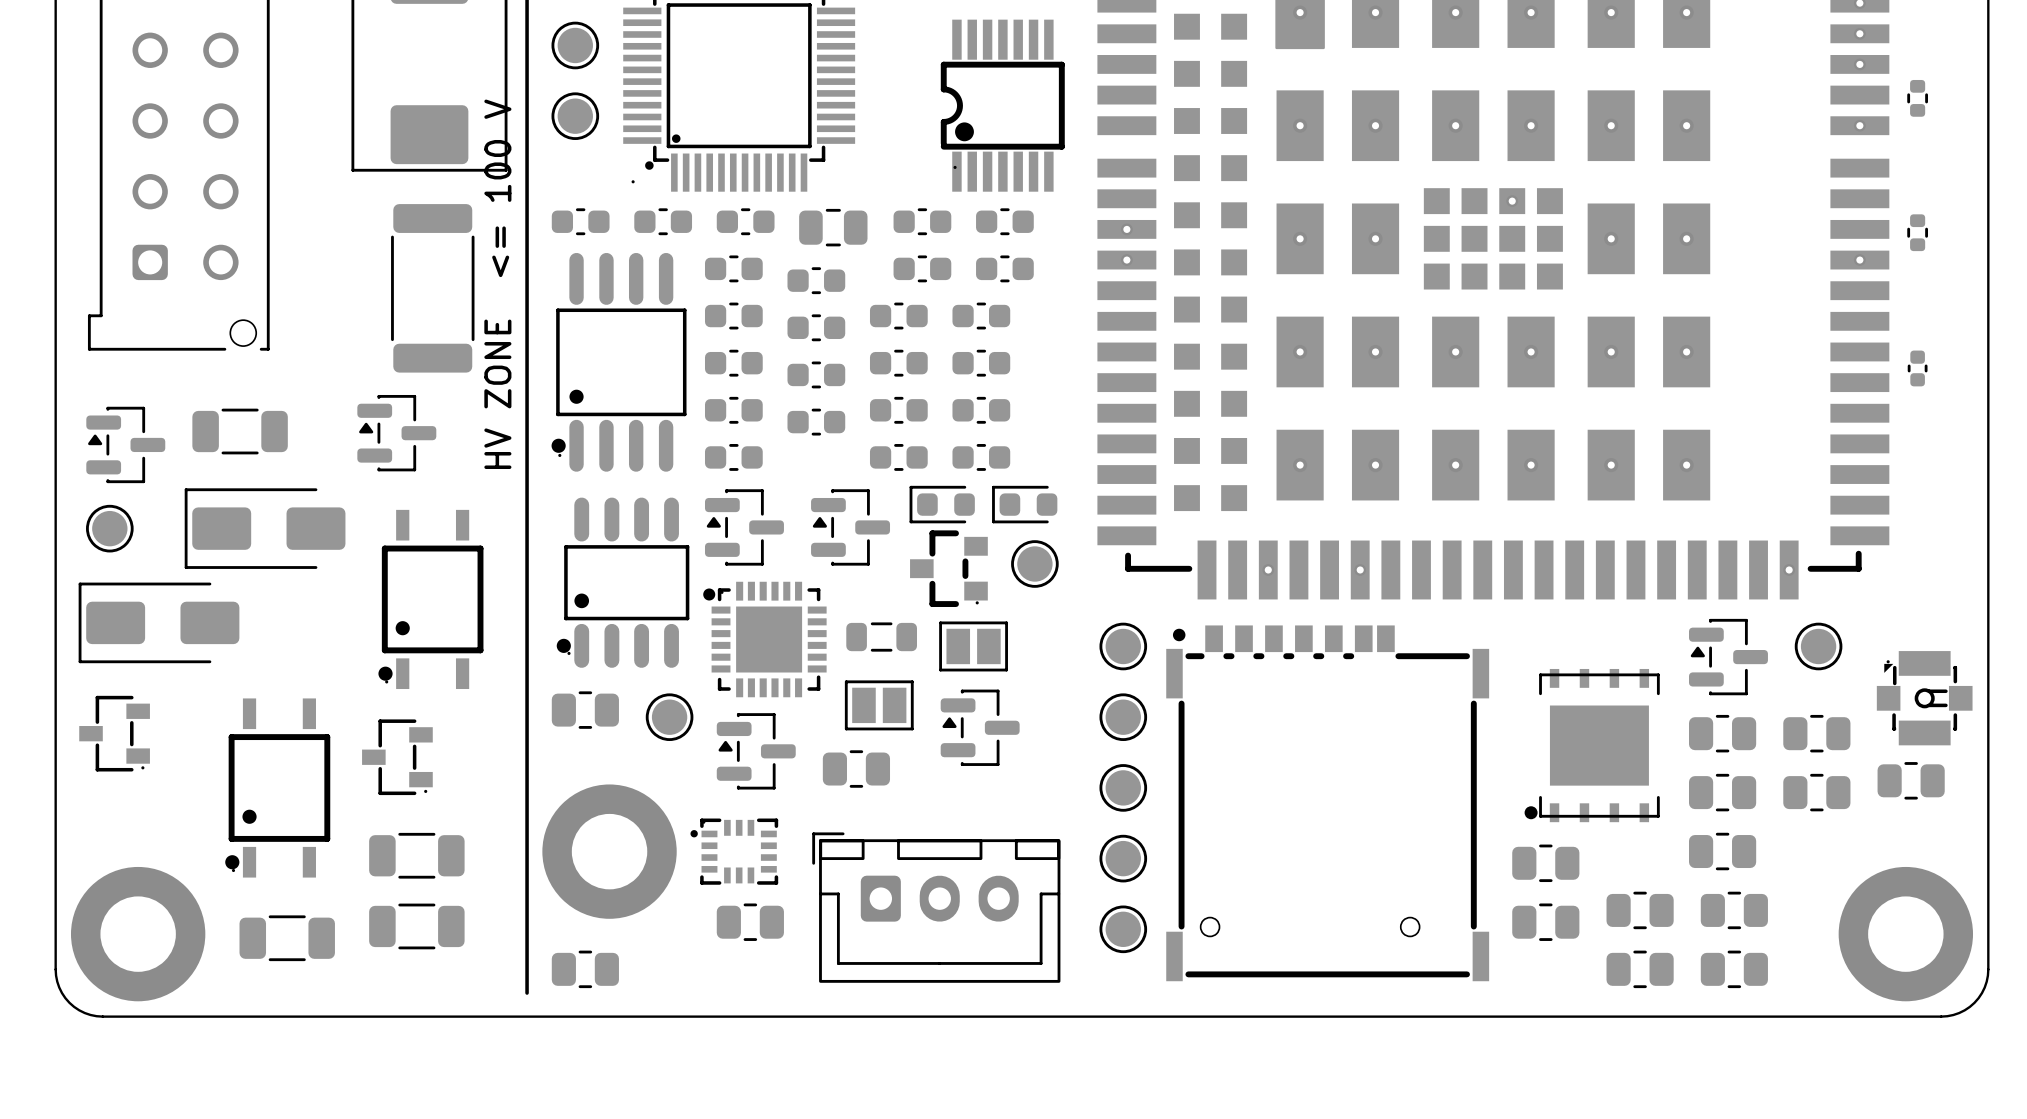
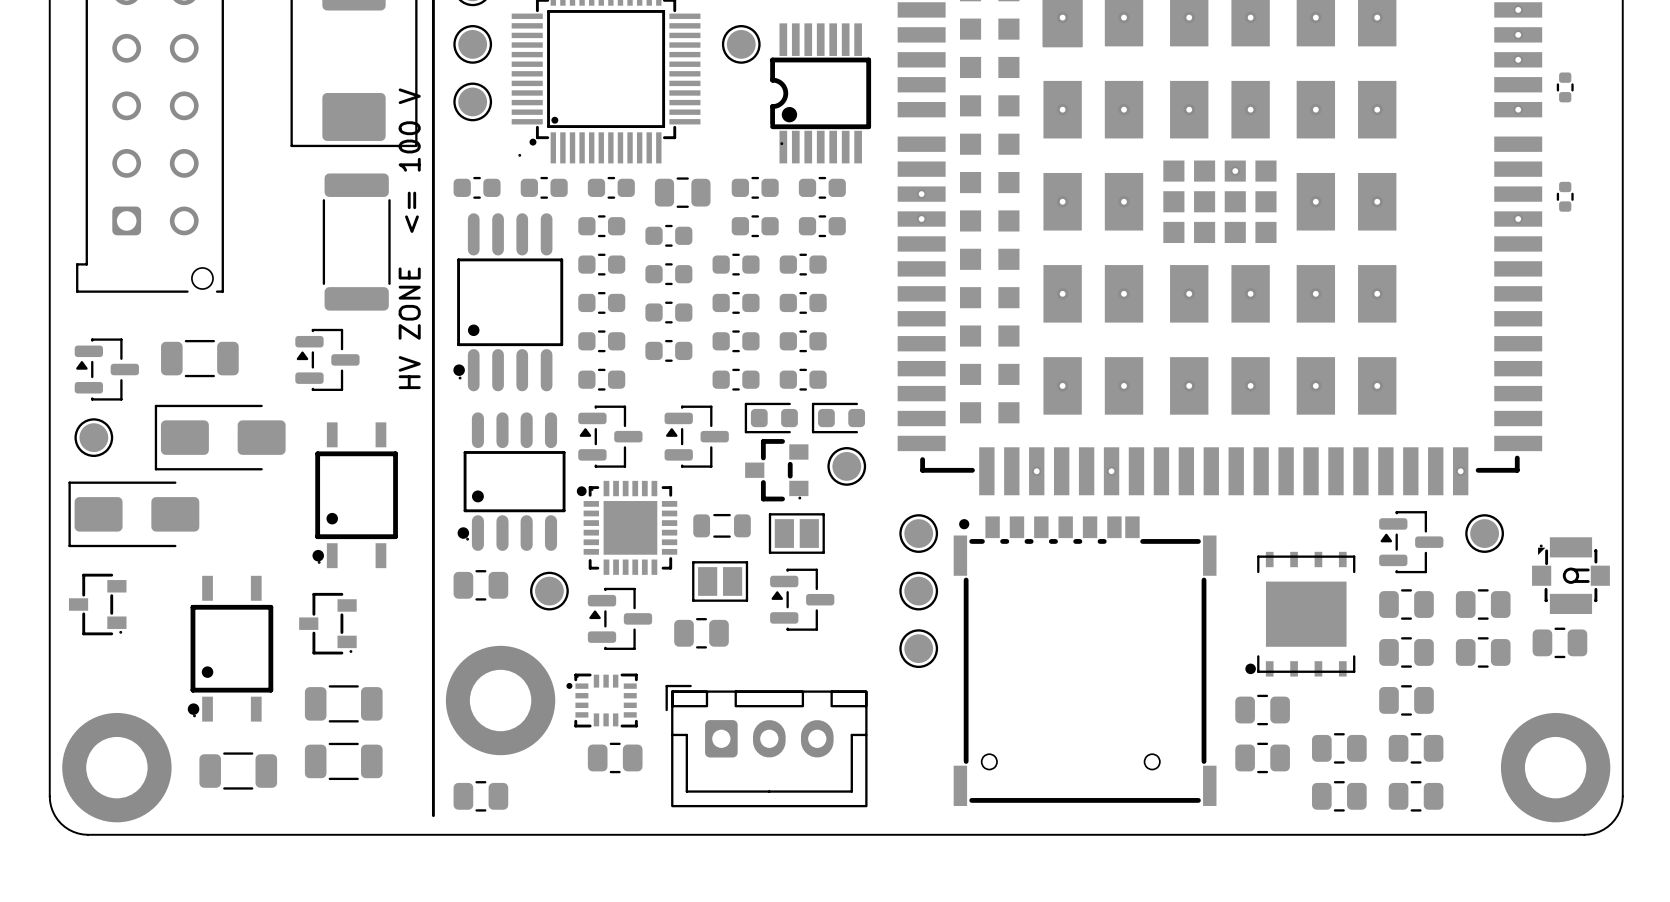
part: none -> (741, 44)
part: (1917, 368) -> none
part: (1123, 858) -> none
part: (1123, 929) -> none

